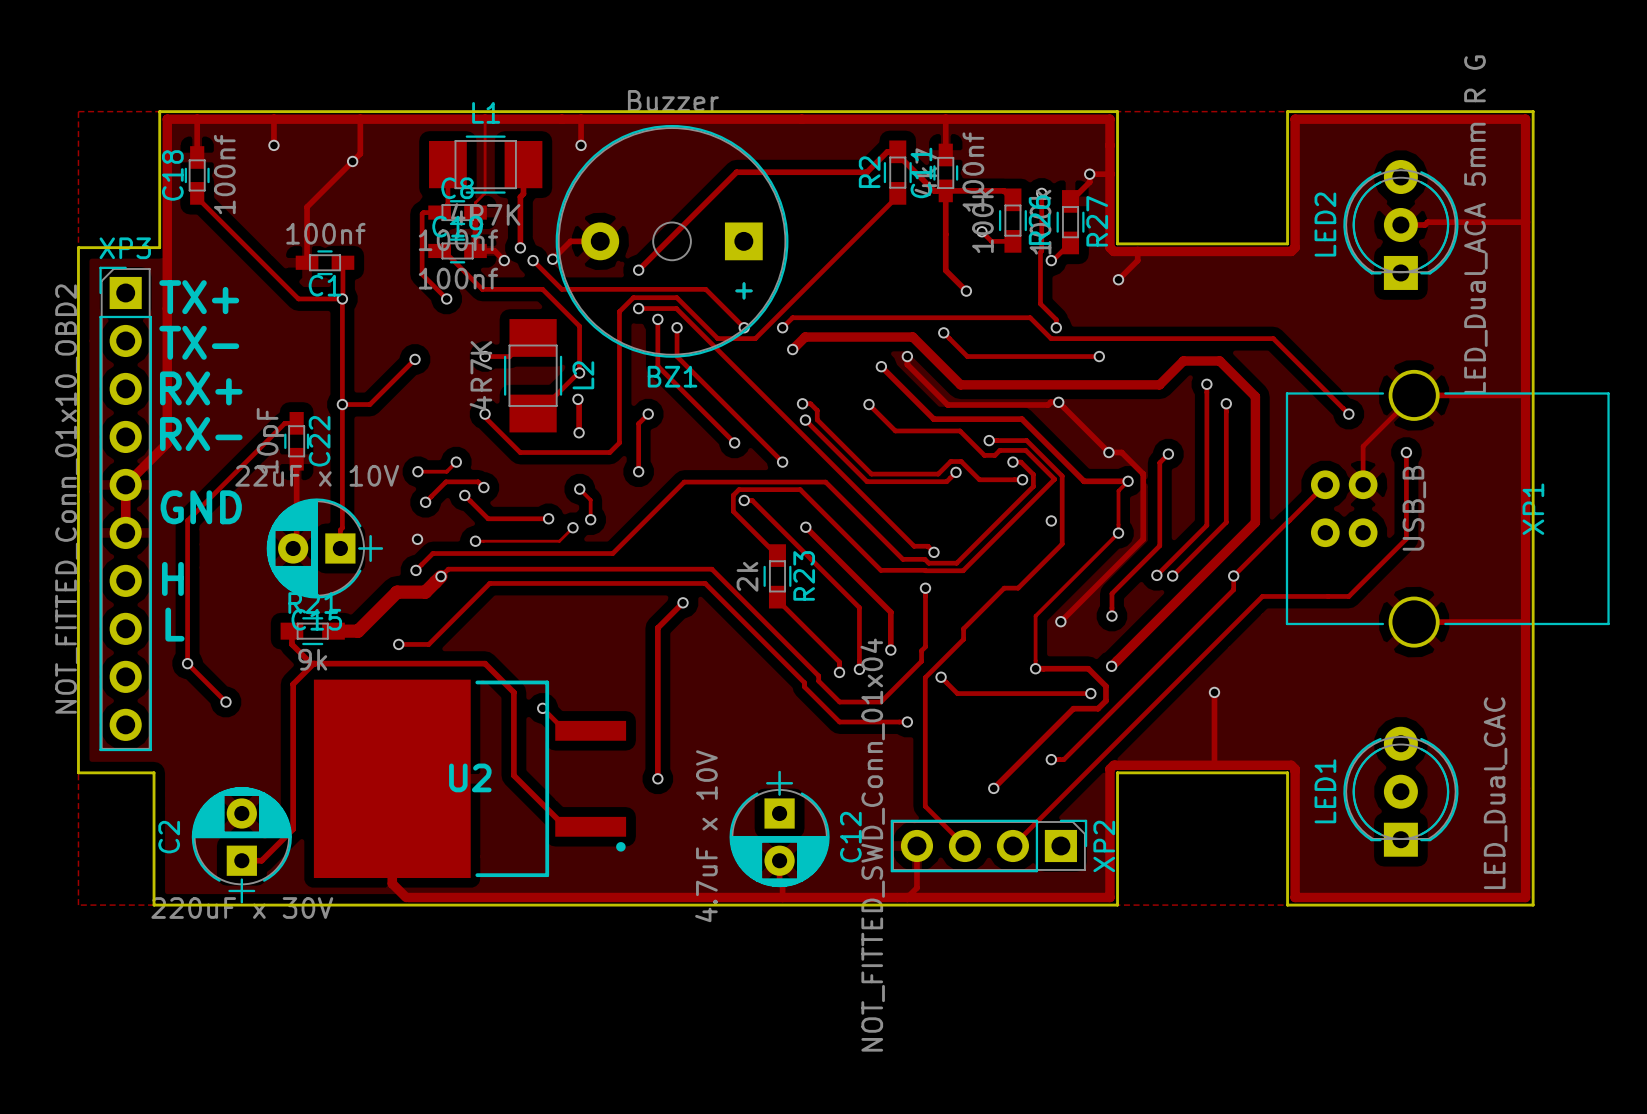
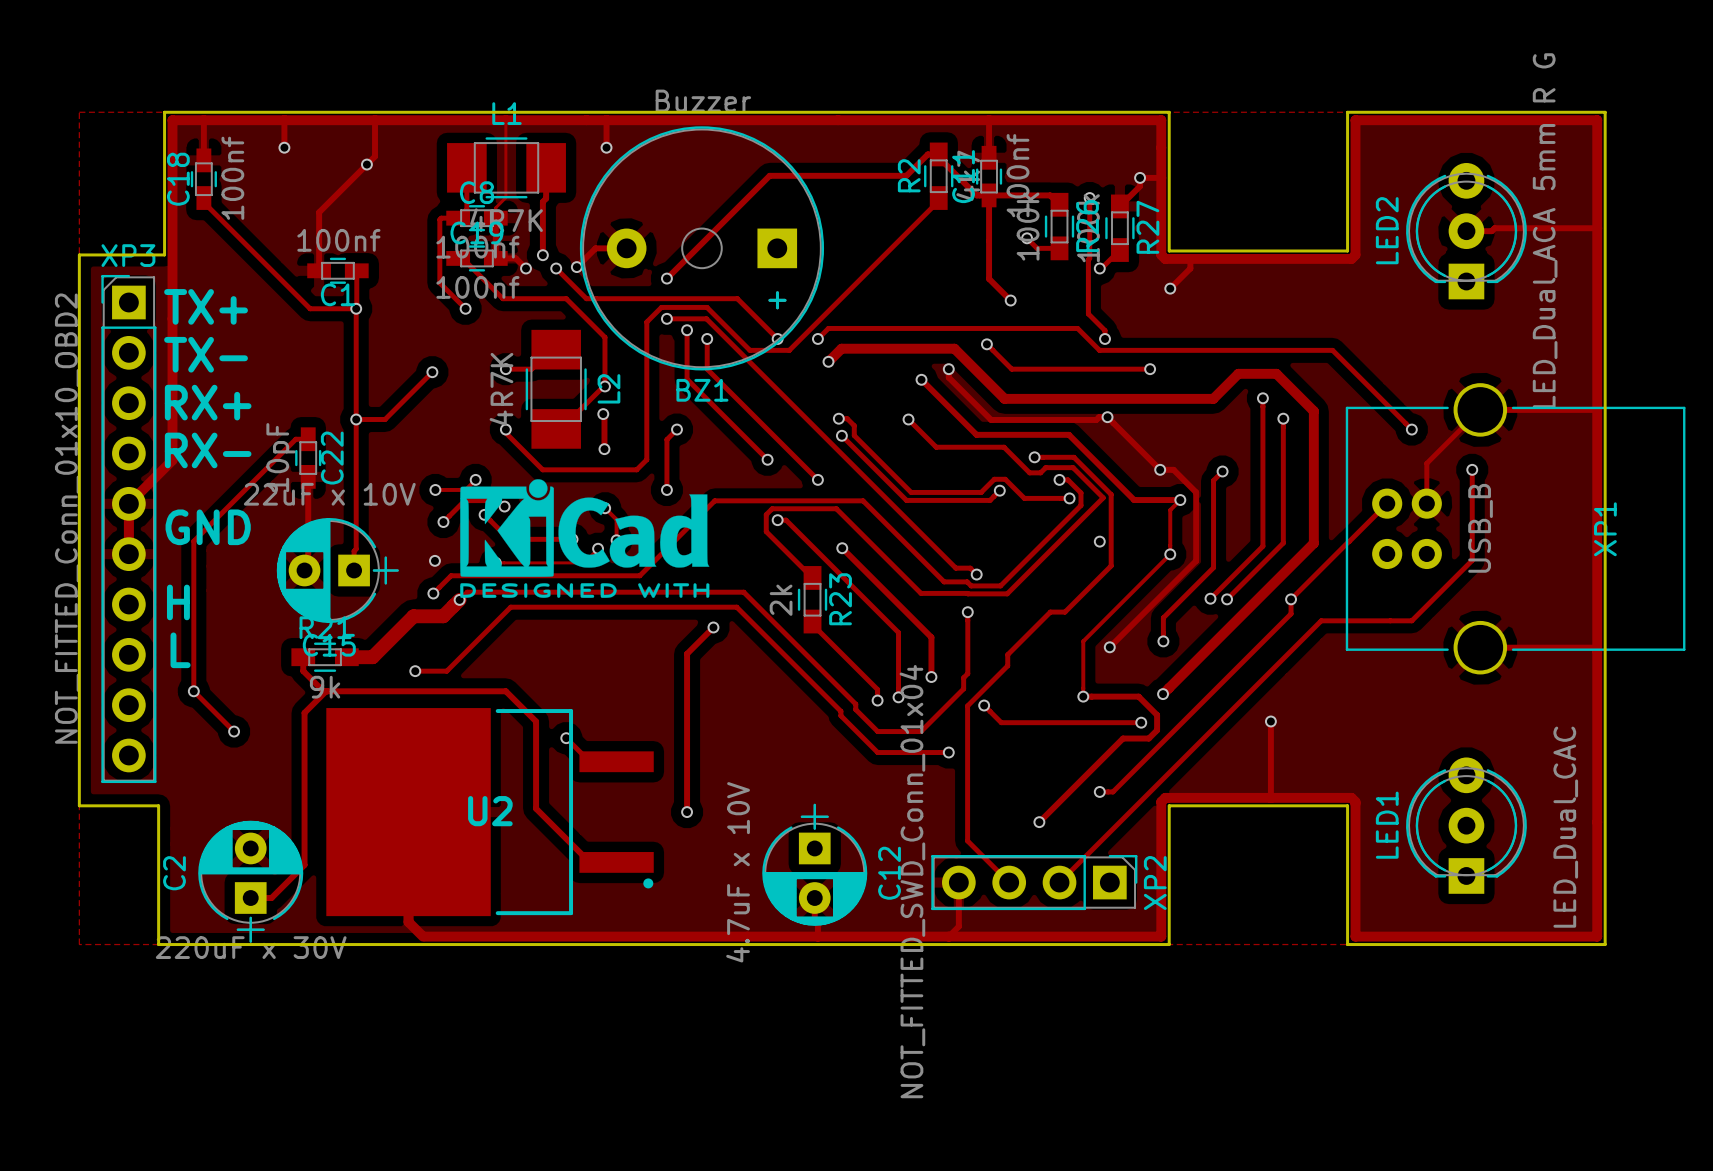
drawing: none -> [460, 479, 710, 598]

